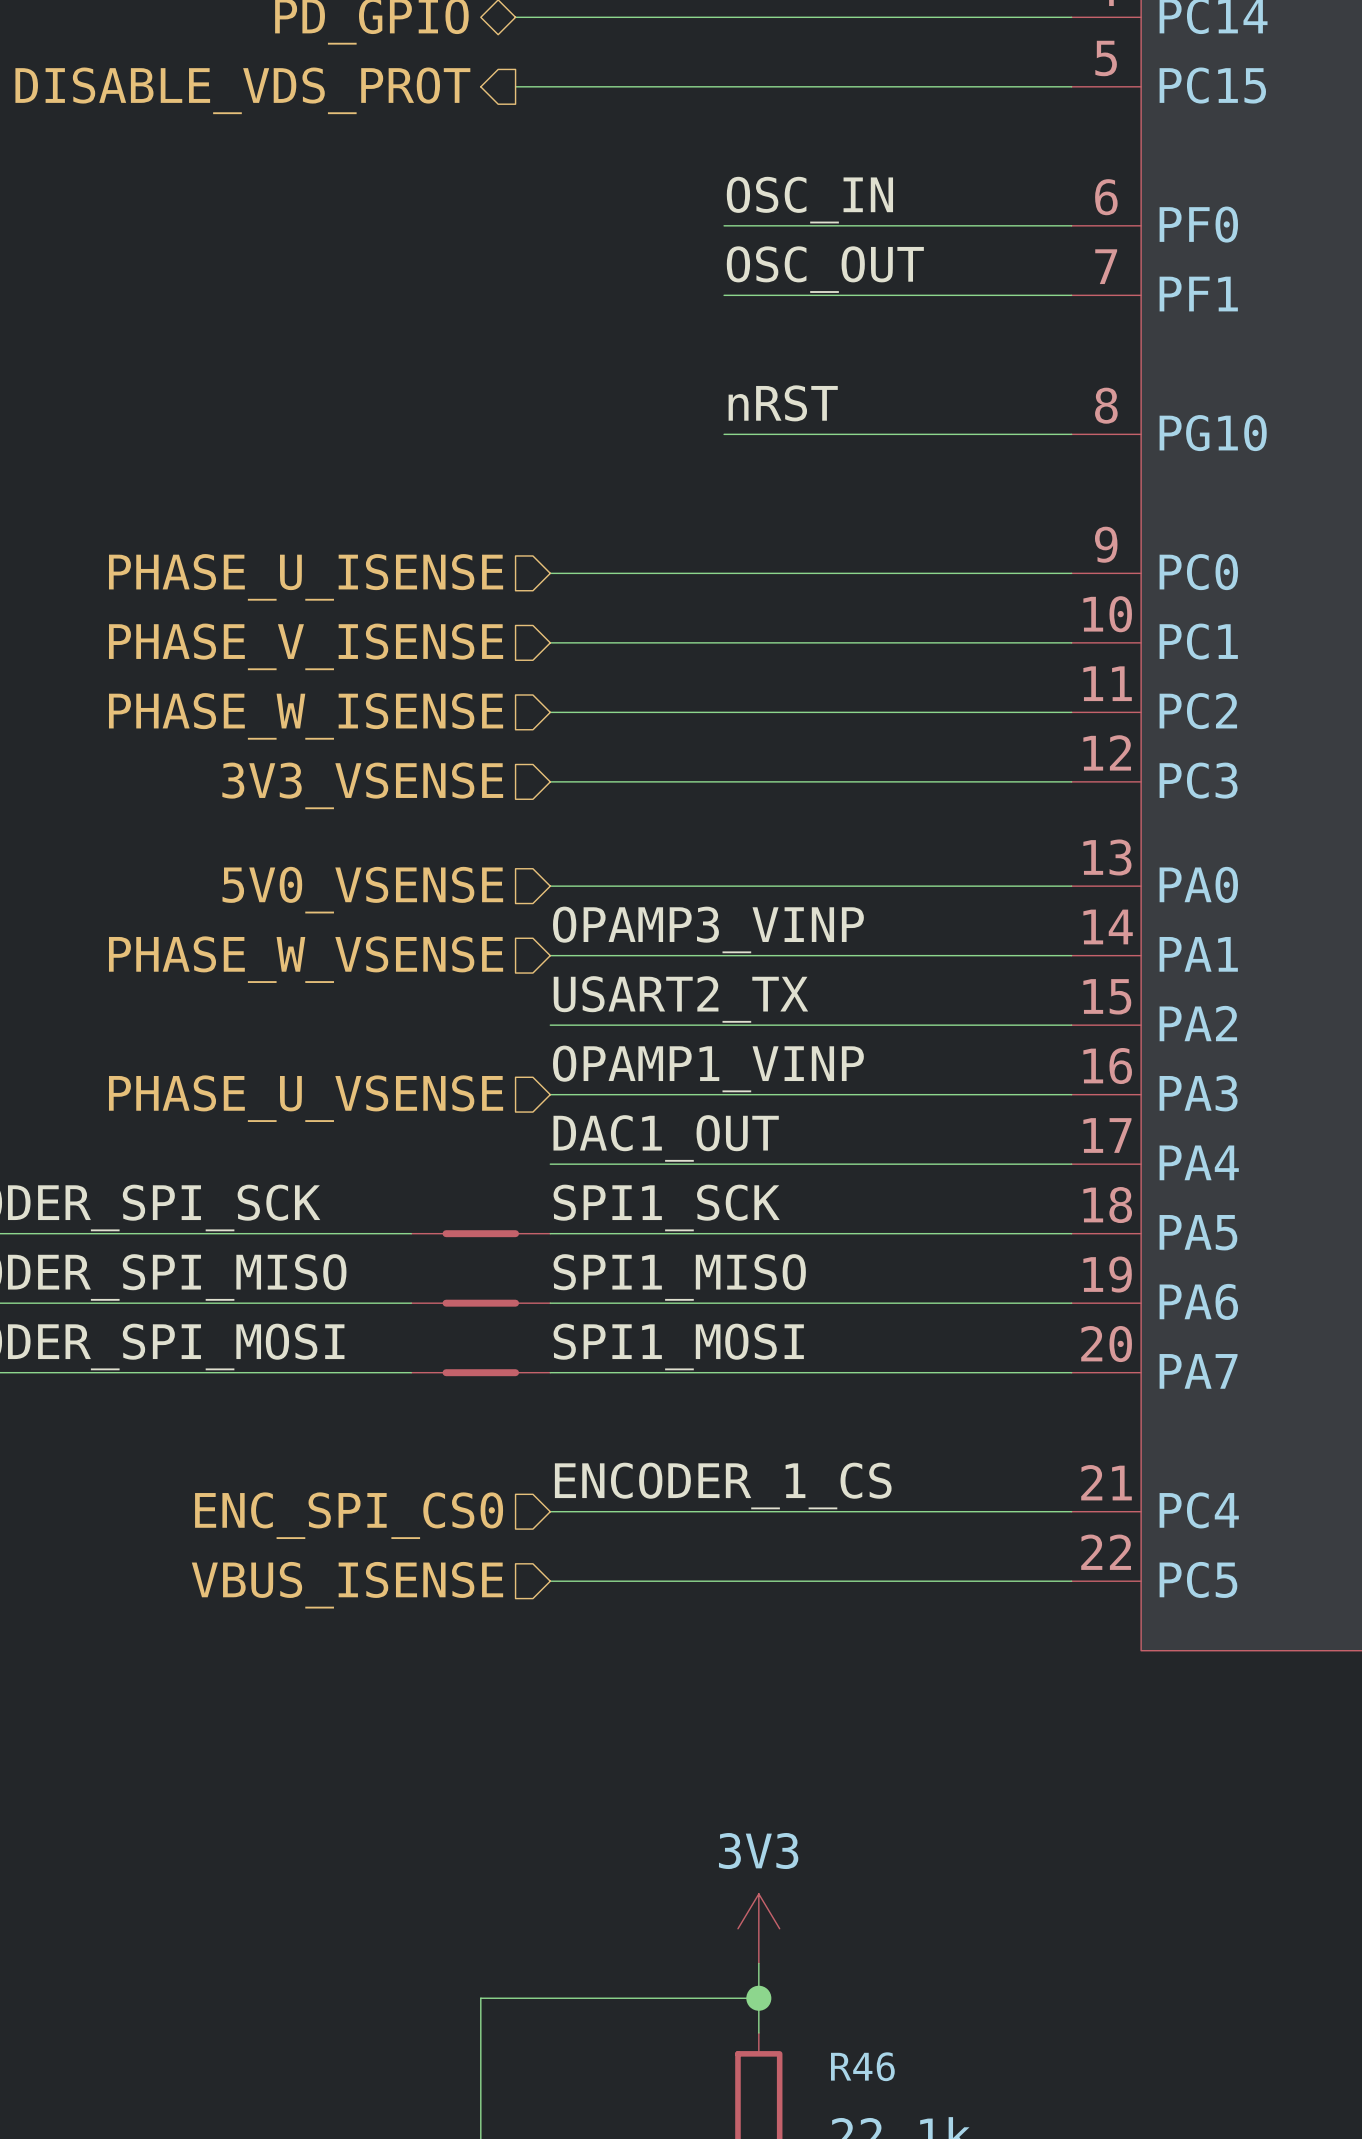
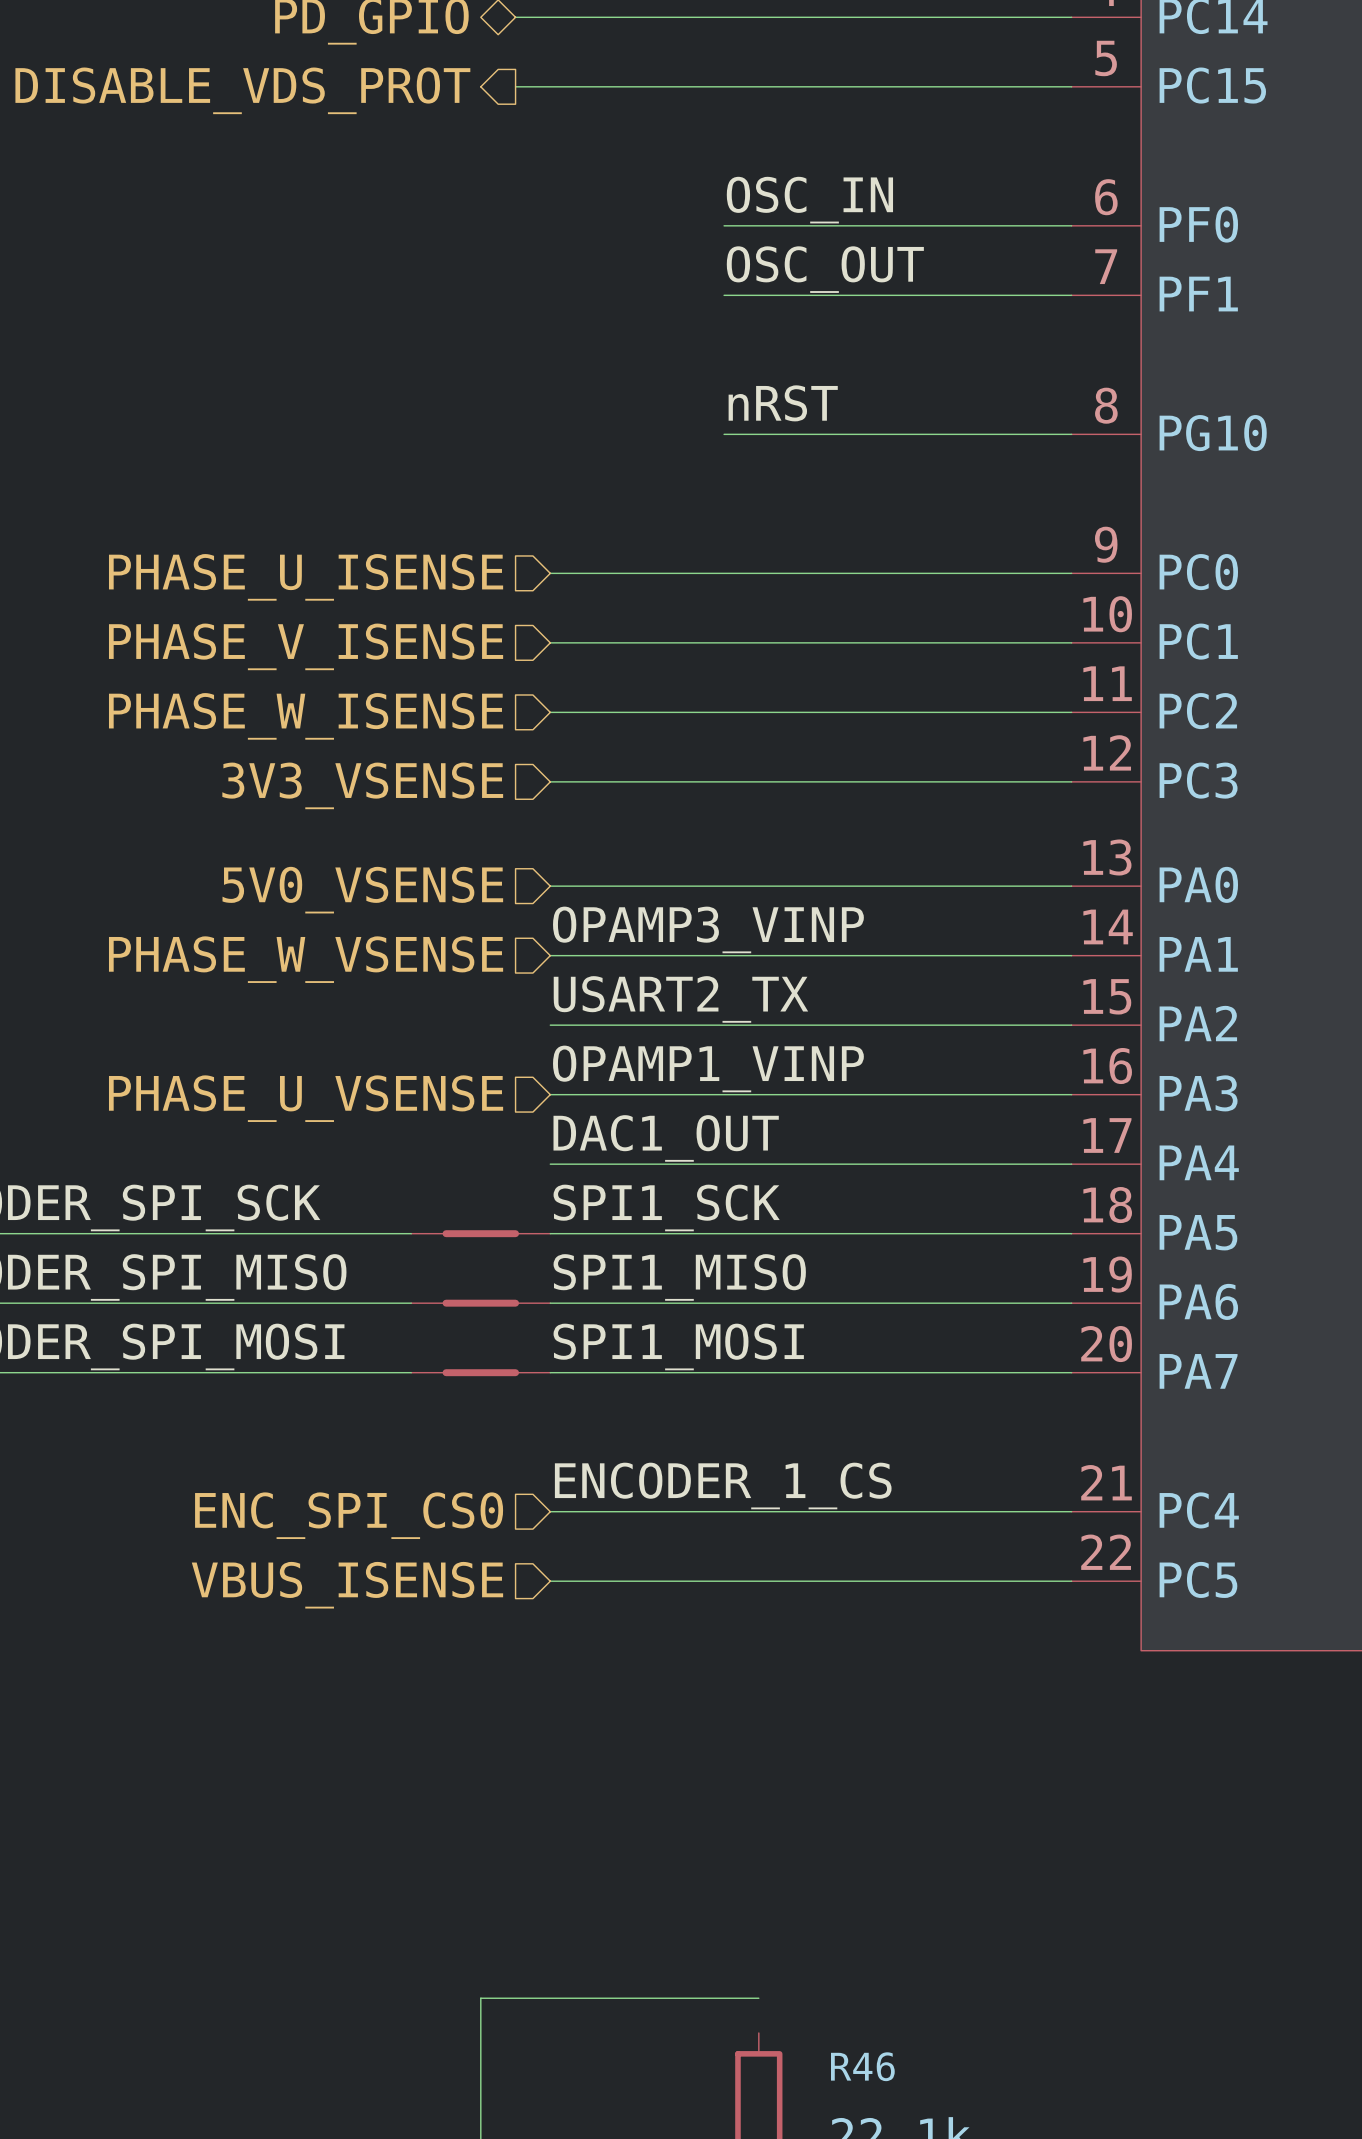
power symbol: 3V3 (758, 1928) -> none
wire: (758, 1963) (758, 2033) -> none
junction: (758, 1998) -> none

